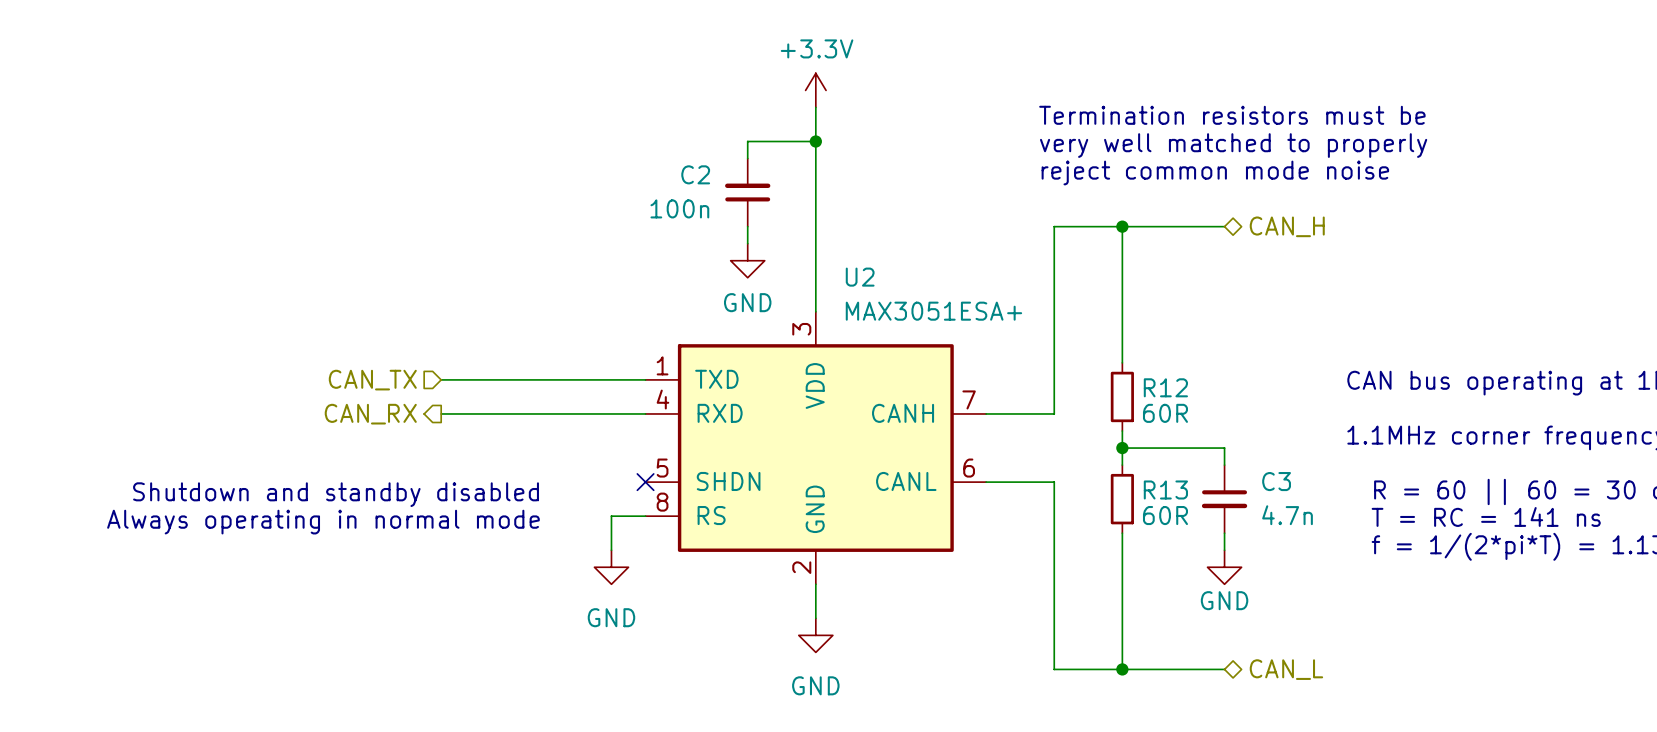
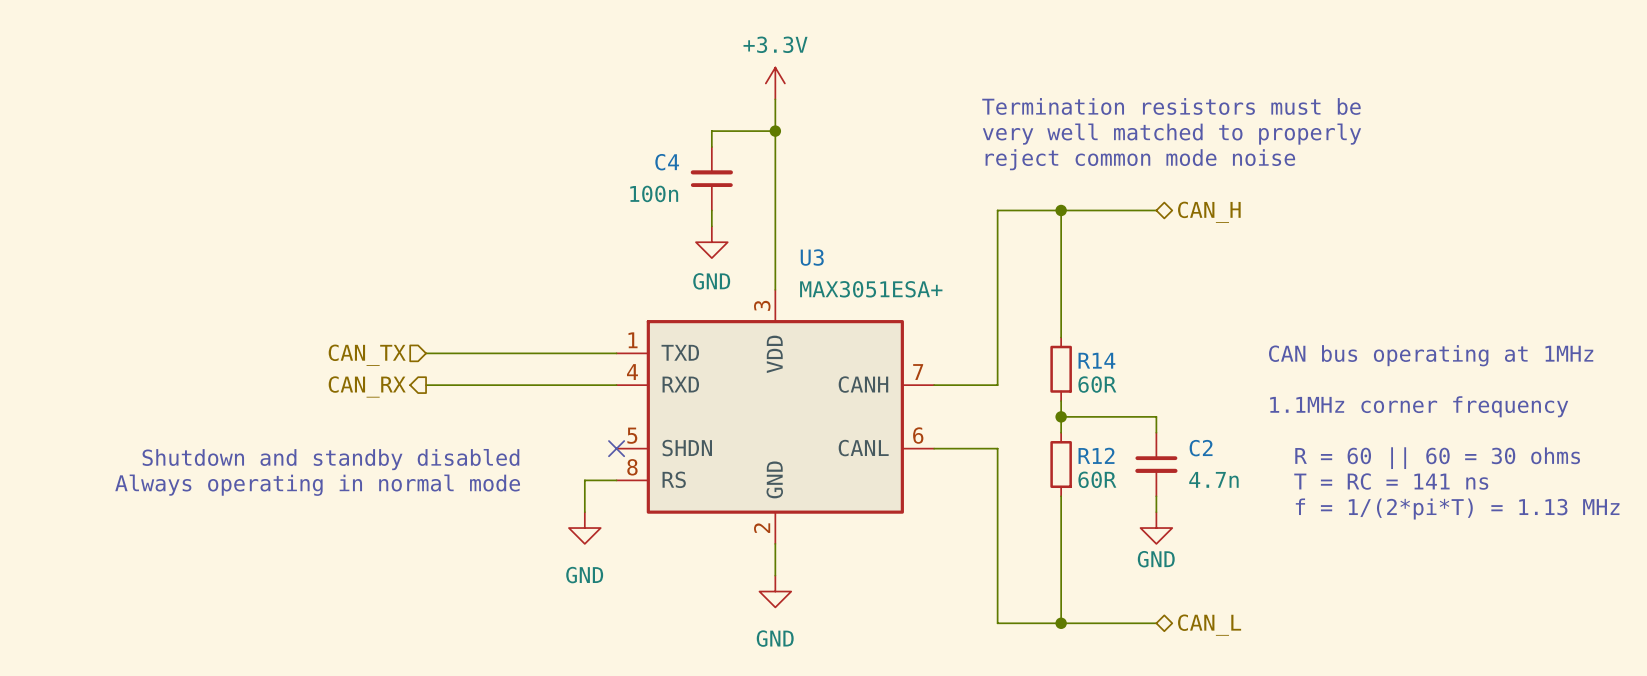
C2 name: C2 (695, 174) -> C4 (667, 162)
U2 name: U2 (860, 277) -> U3 (812, 257)
R12 name: R12 (1165, 387) -> R14 (1096, 360)
C3 name: C3 (1276, 481) -> C2 (1201, 448)
R13 name: R13 (1165, 489) -> R12 (1096, 455)

